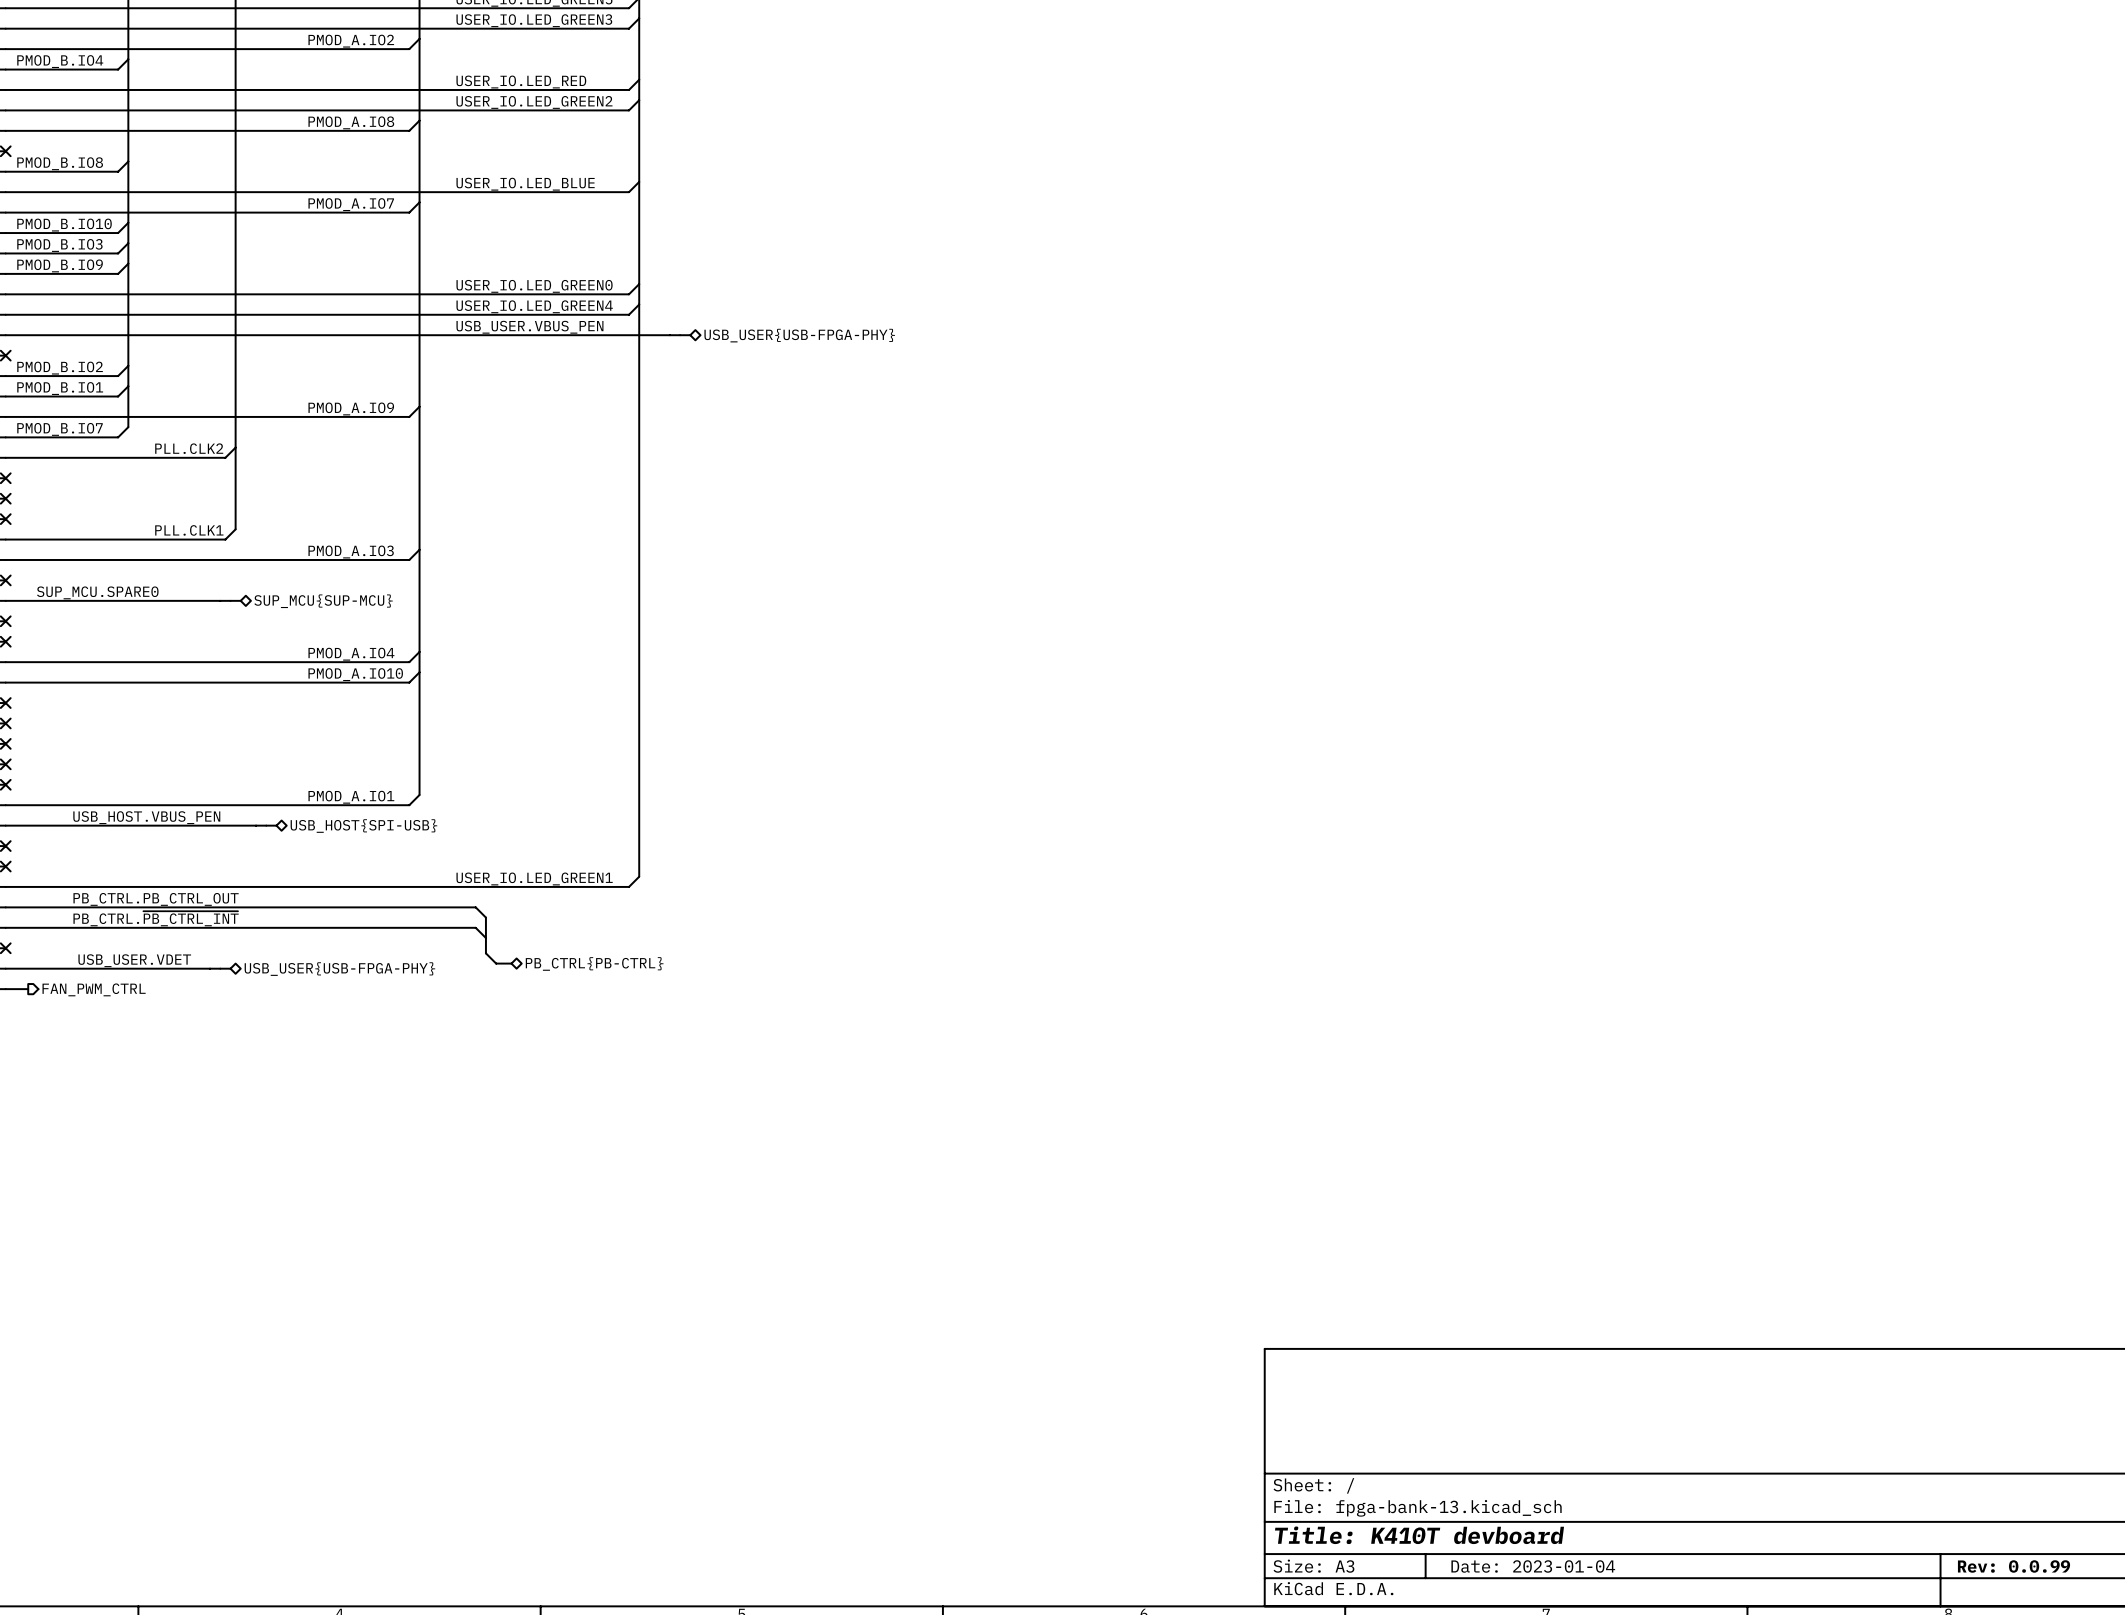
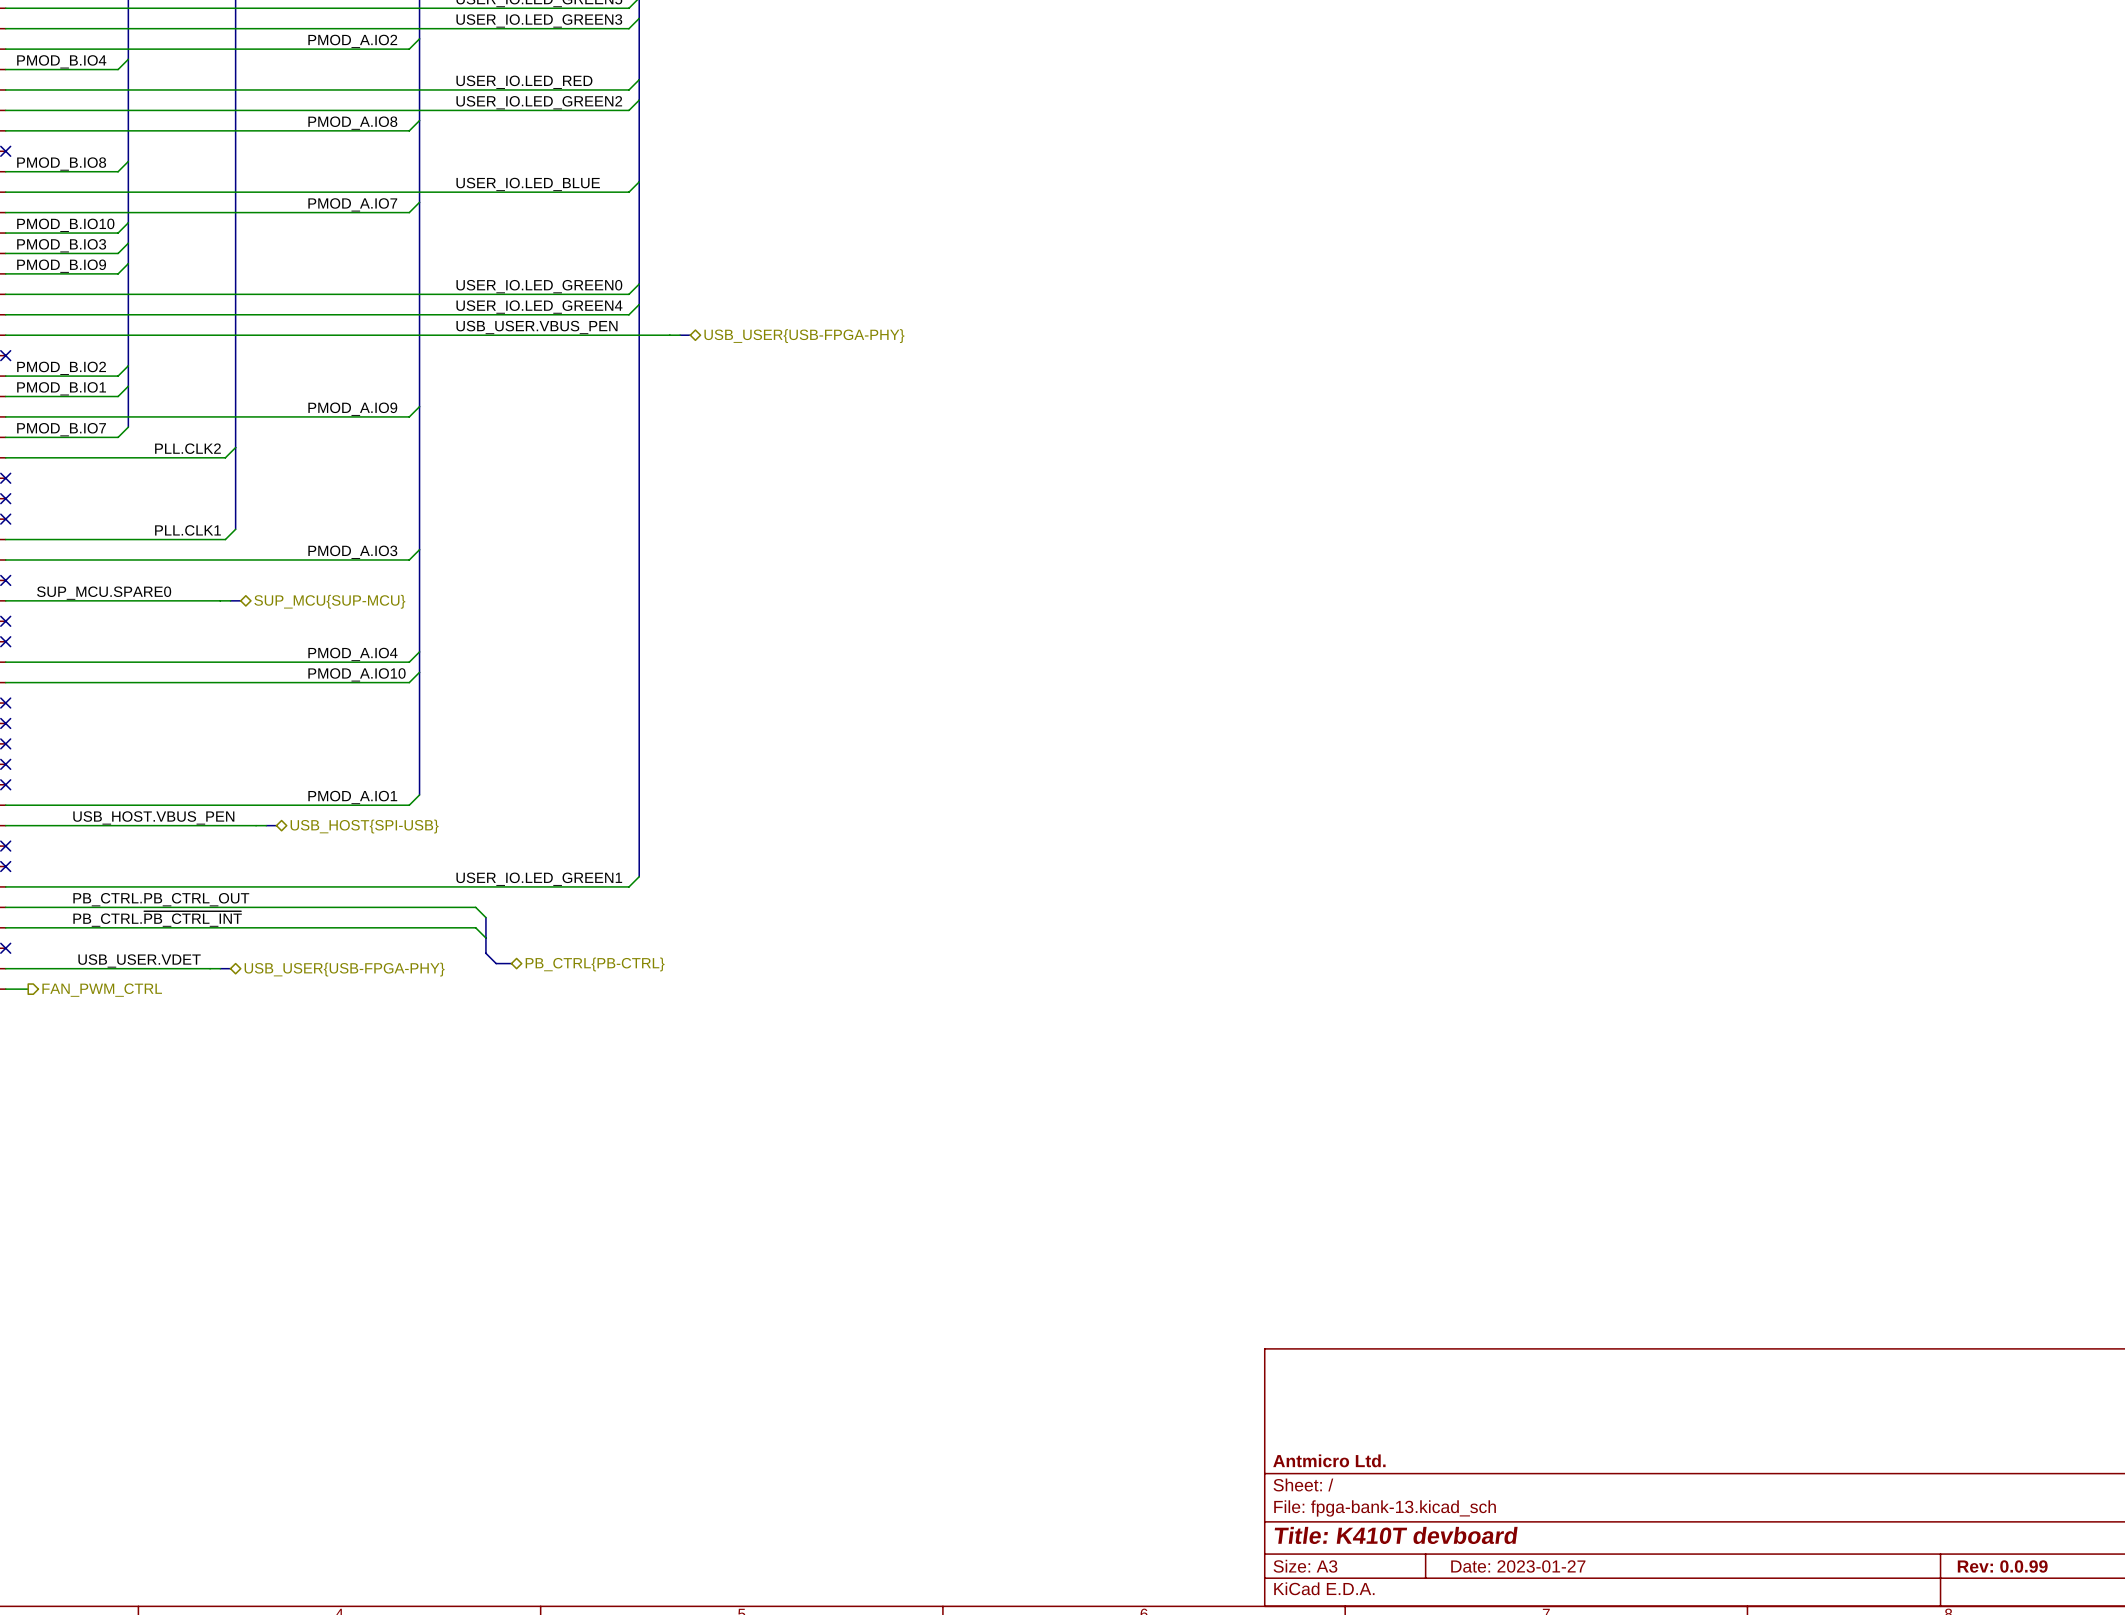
title block: none -> Antmicro Ltd. (1329, 1460)
title block: Date: 2023-01-04 (1533, 1566) -> Date: 2023-01-27 (1518, 1566)

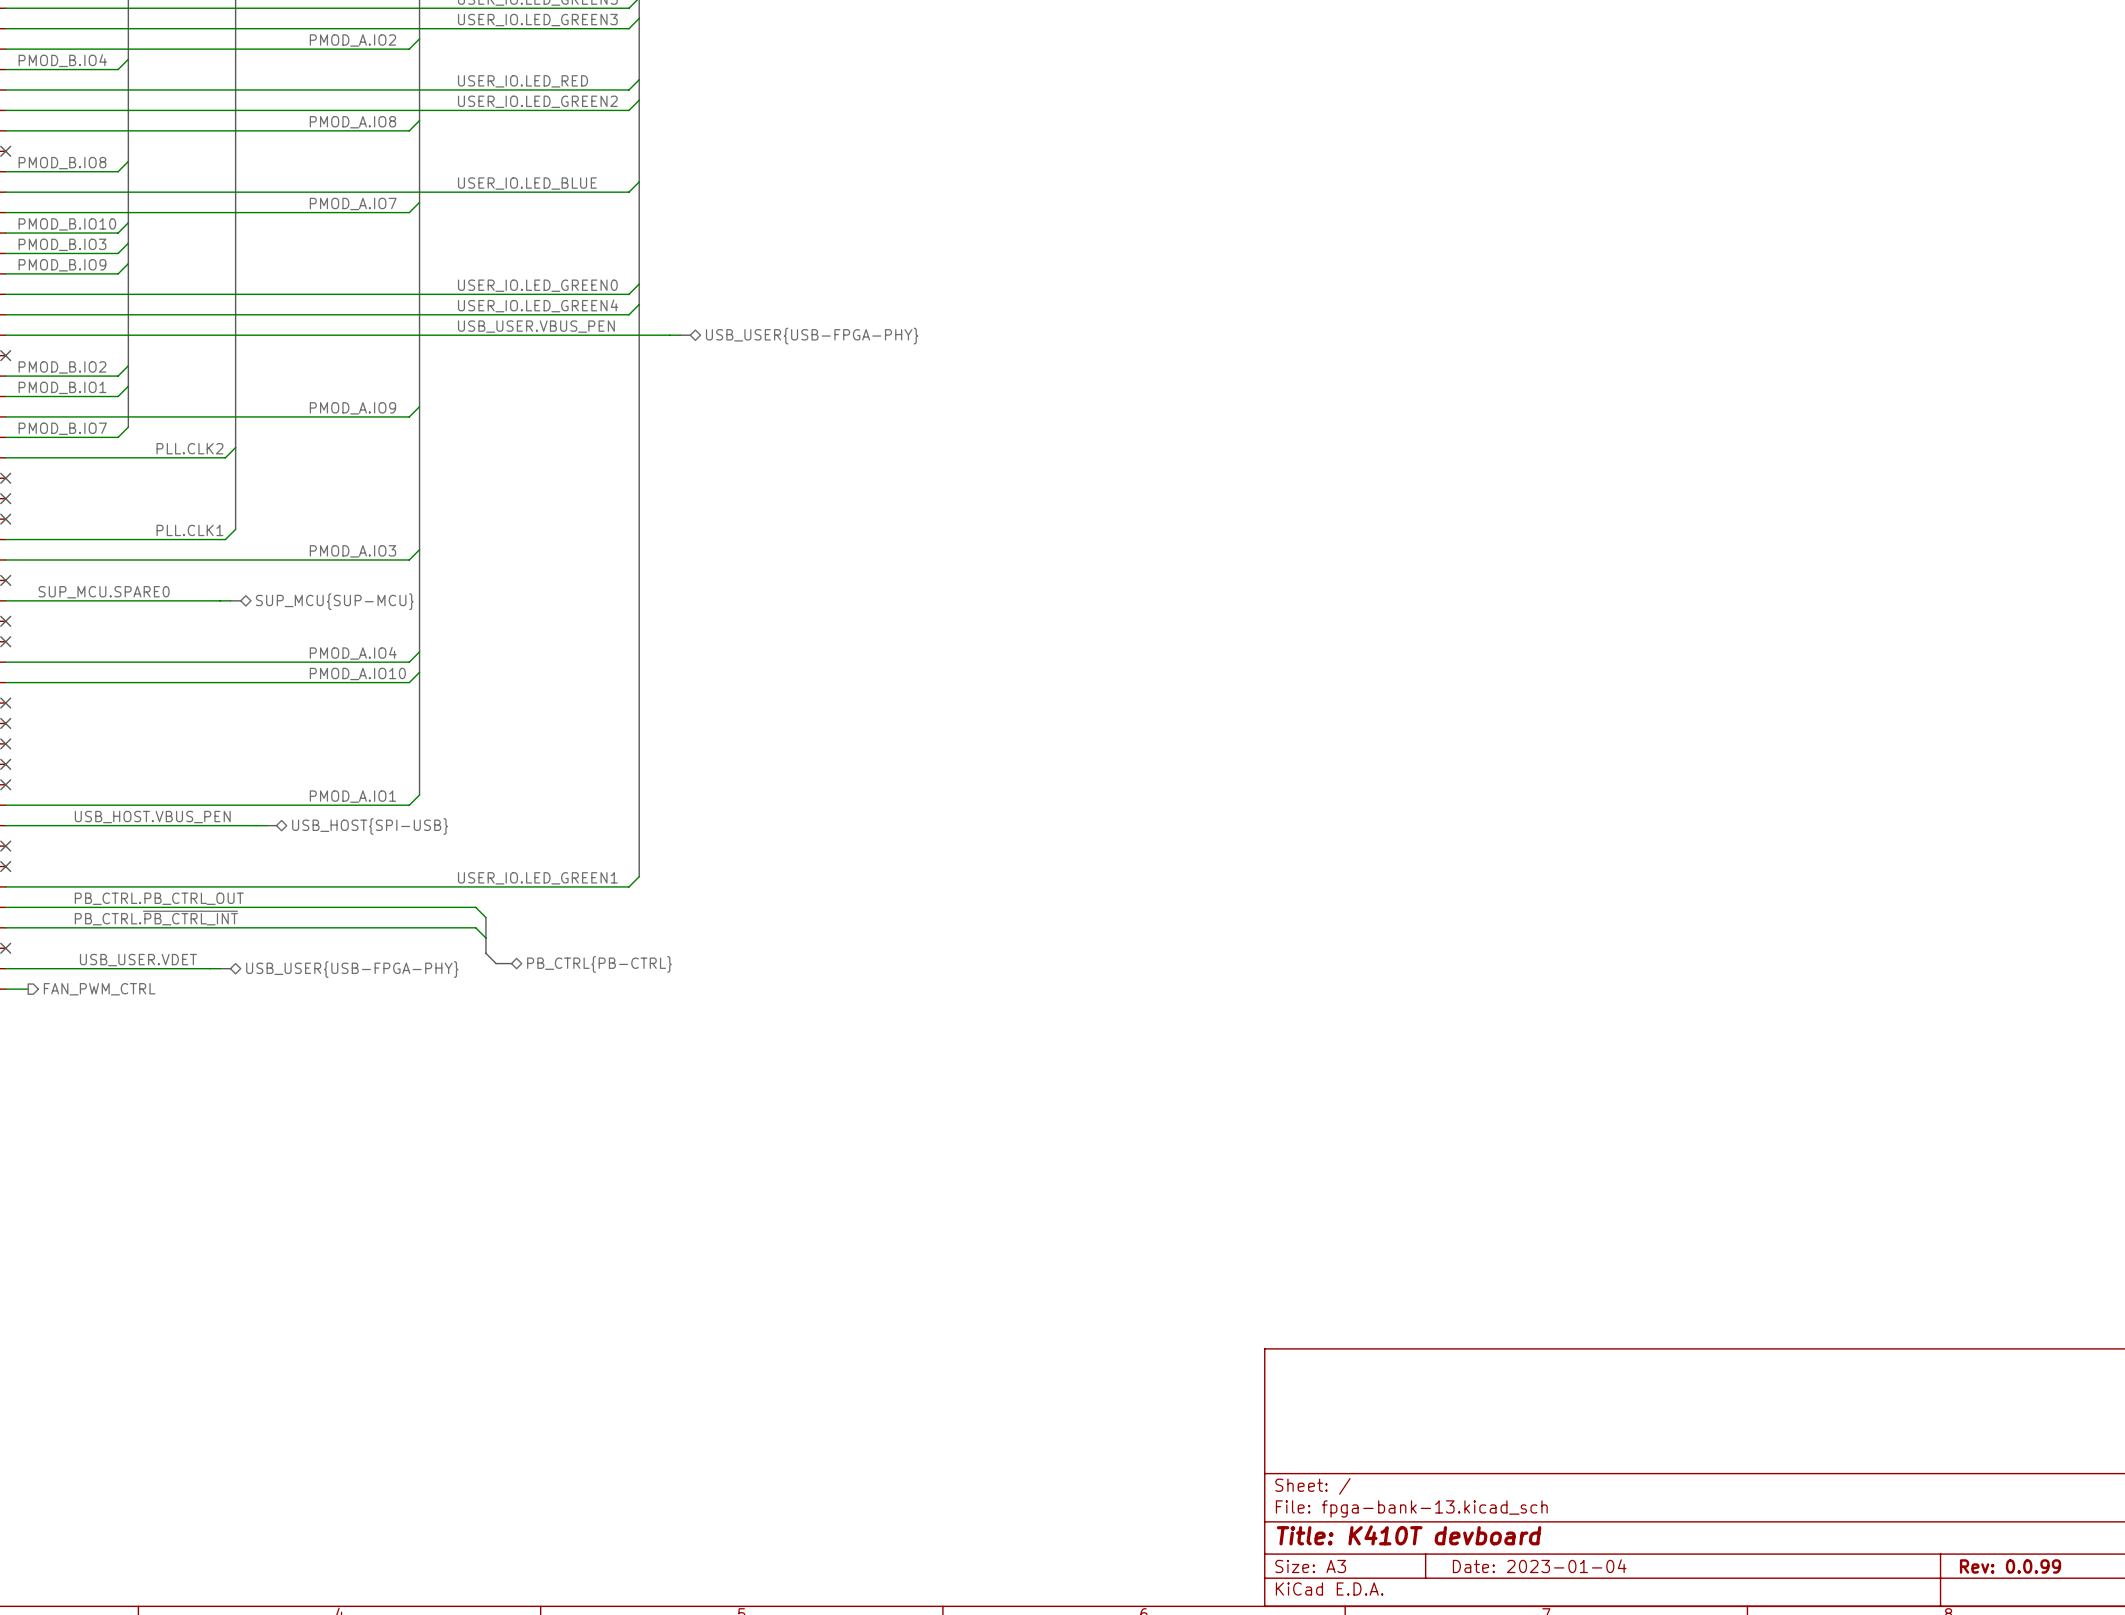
title block: Antmicro Ltd. (1329, 1460) -> none
title block: Date: 2023-01-27 (1518, 1566) -> Date: 2023-01-04 (1539, 1566)

